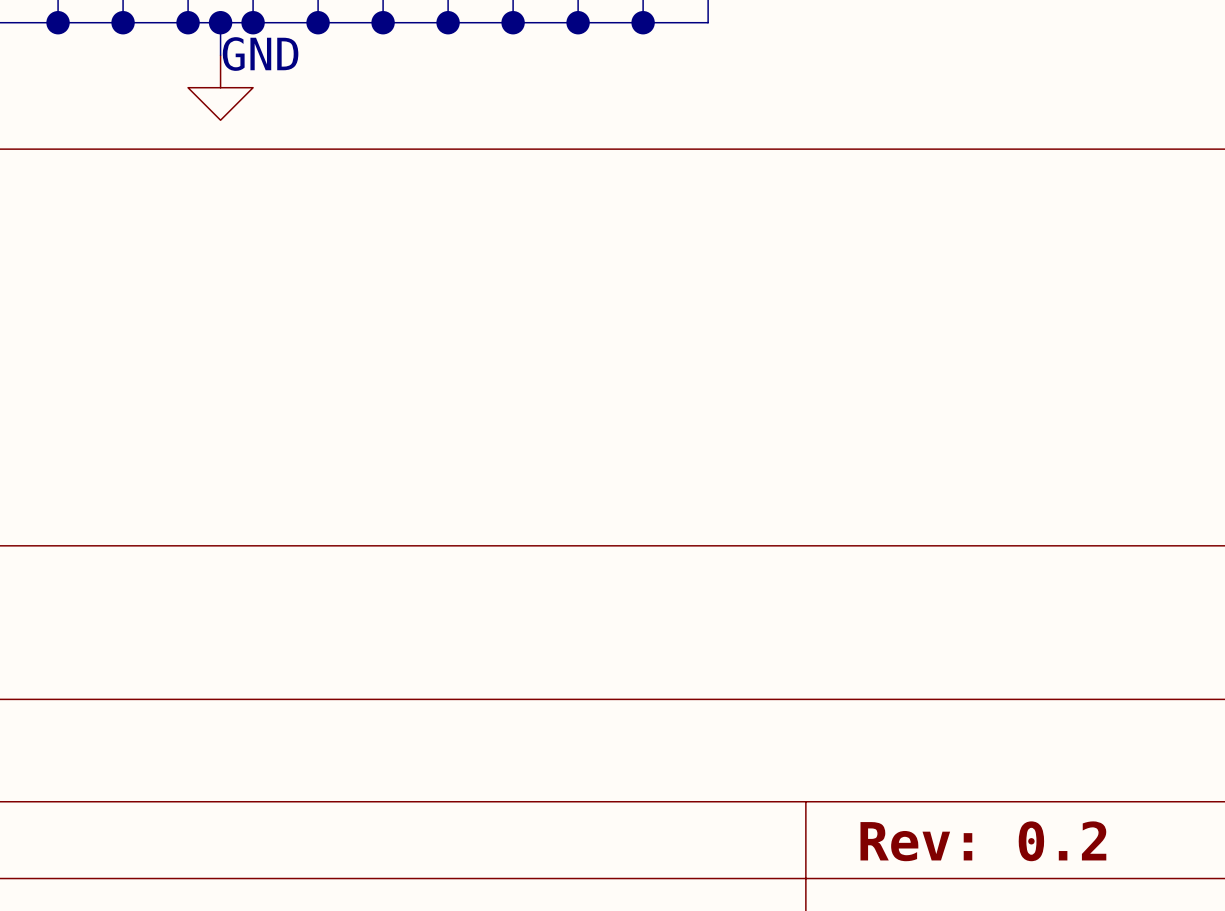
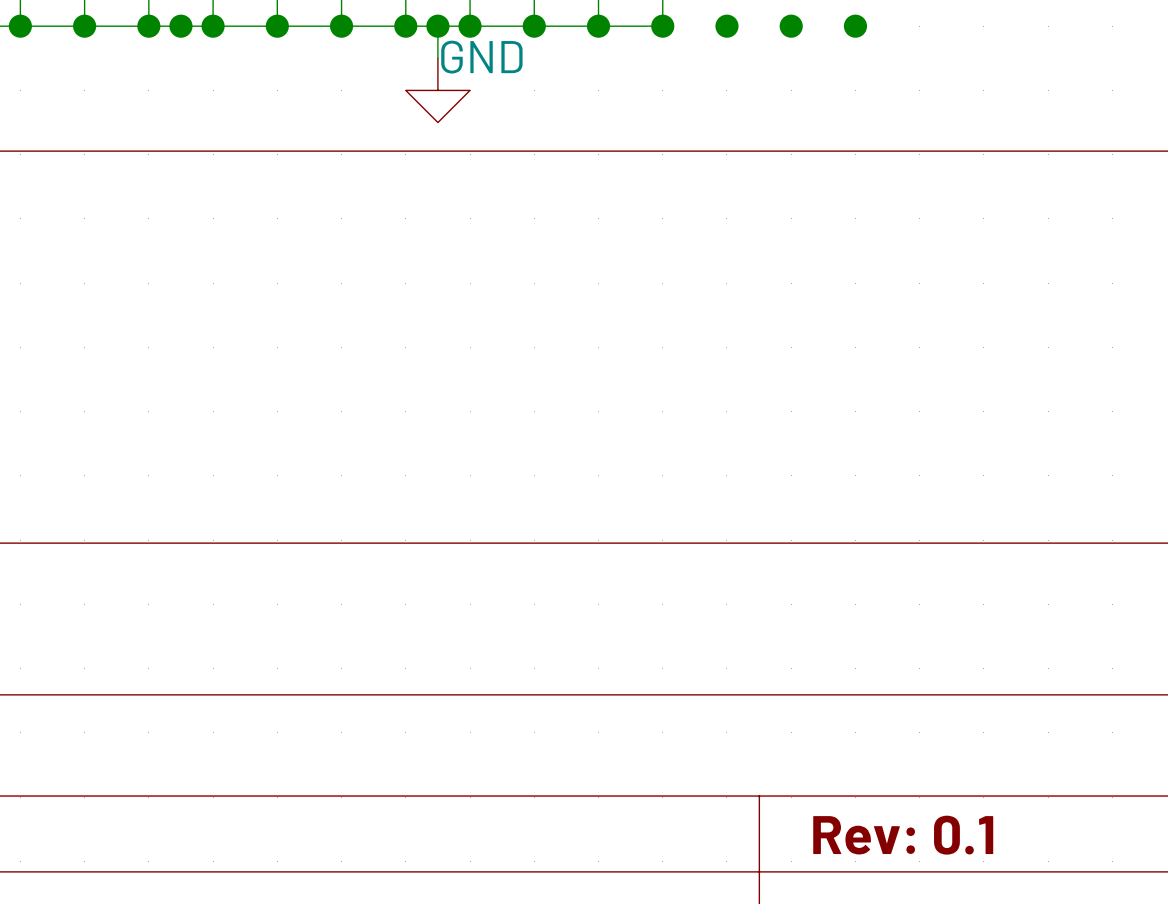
wire: (220, 22) (220, 55) -> (437, 26) (437, 58)
junction: none -> (437, 26)
junction: none -> (662, 26)
junction: none -> (726, 26)
junction: none -> (791, 26)
junction: none -> (855, 26)
power symbol position: GND (220, 87) -> GND (437, 90)
title block: Rev: 0.2 (983, 841) -> Rev: 0.1 (903, 835)

